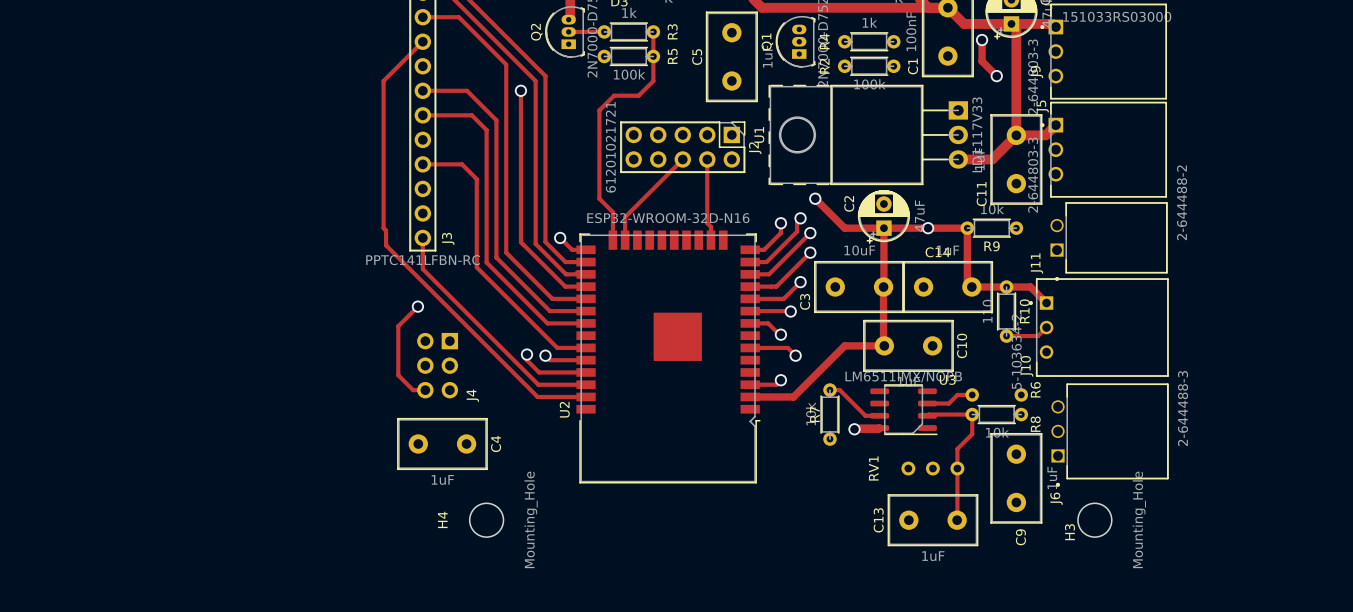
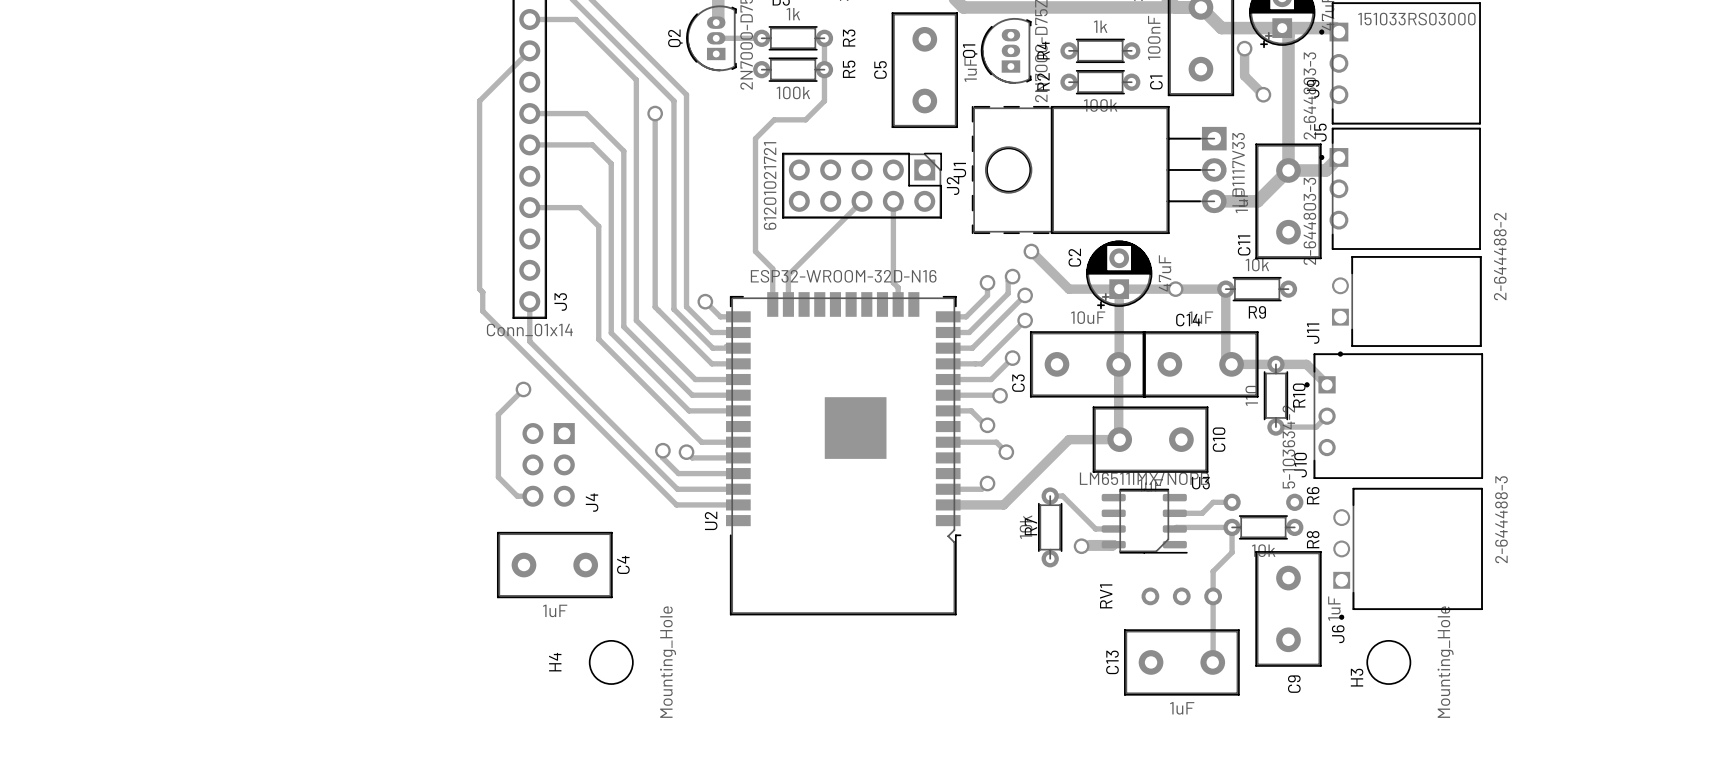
J3 value: PPTC141LFBN-RC (423, 260) -> Conn_01x14 (529, 329)

